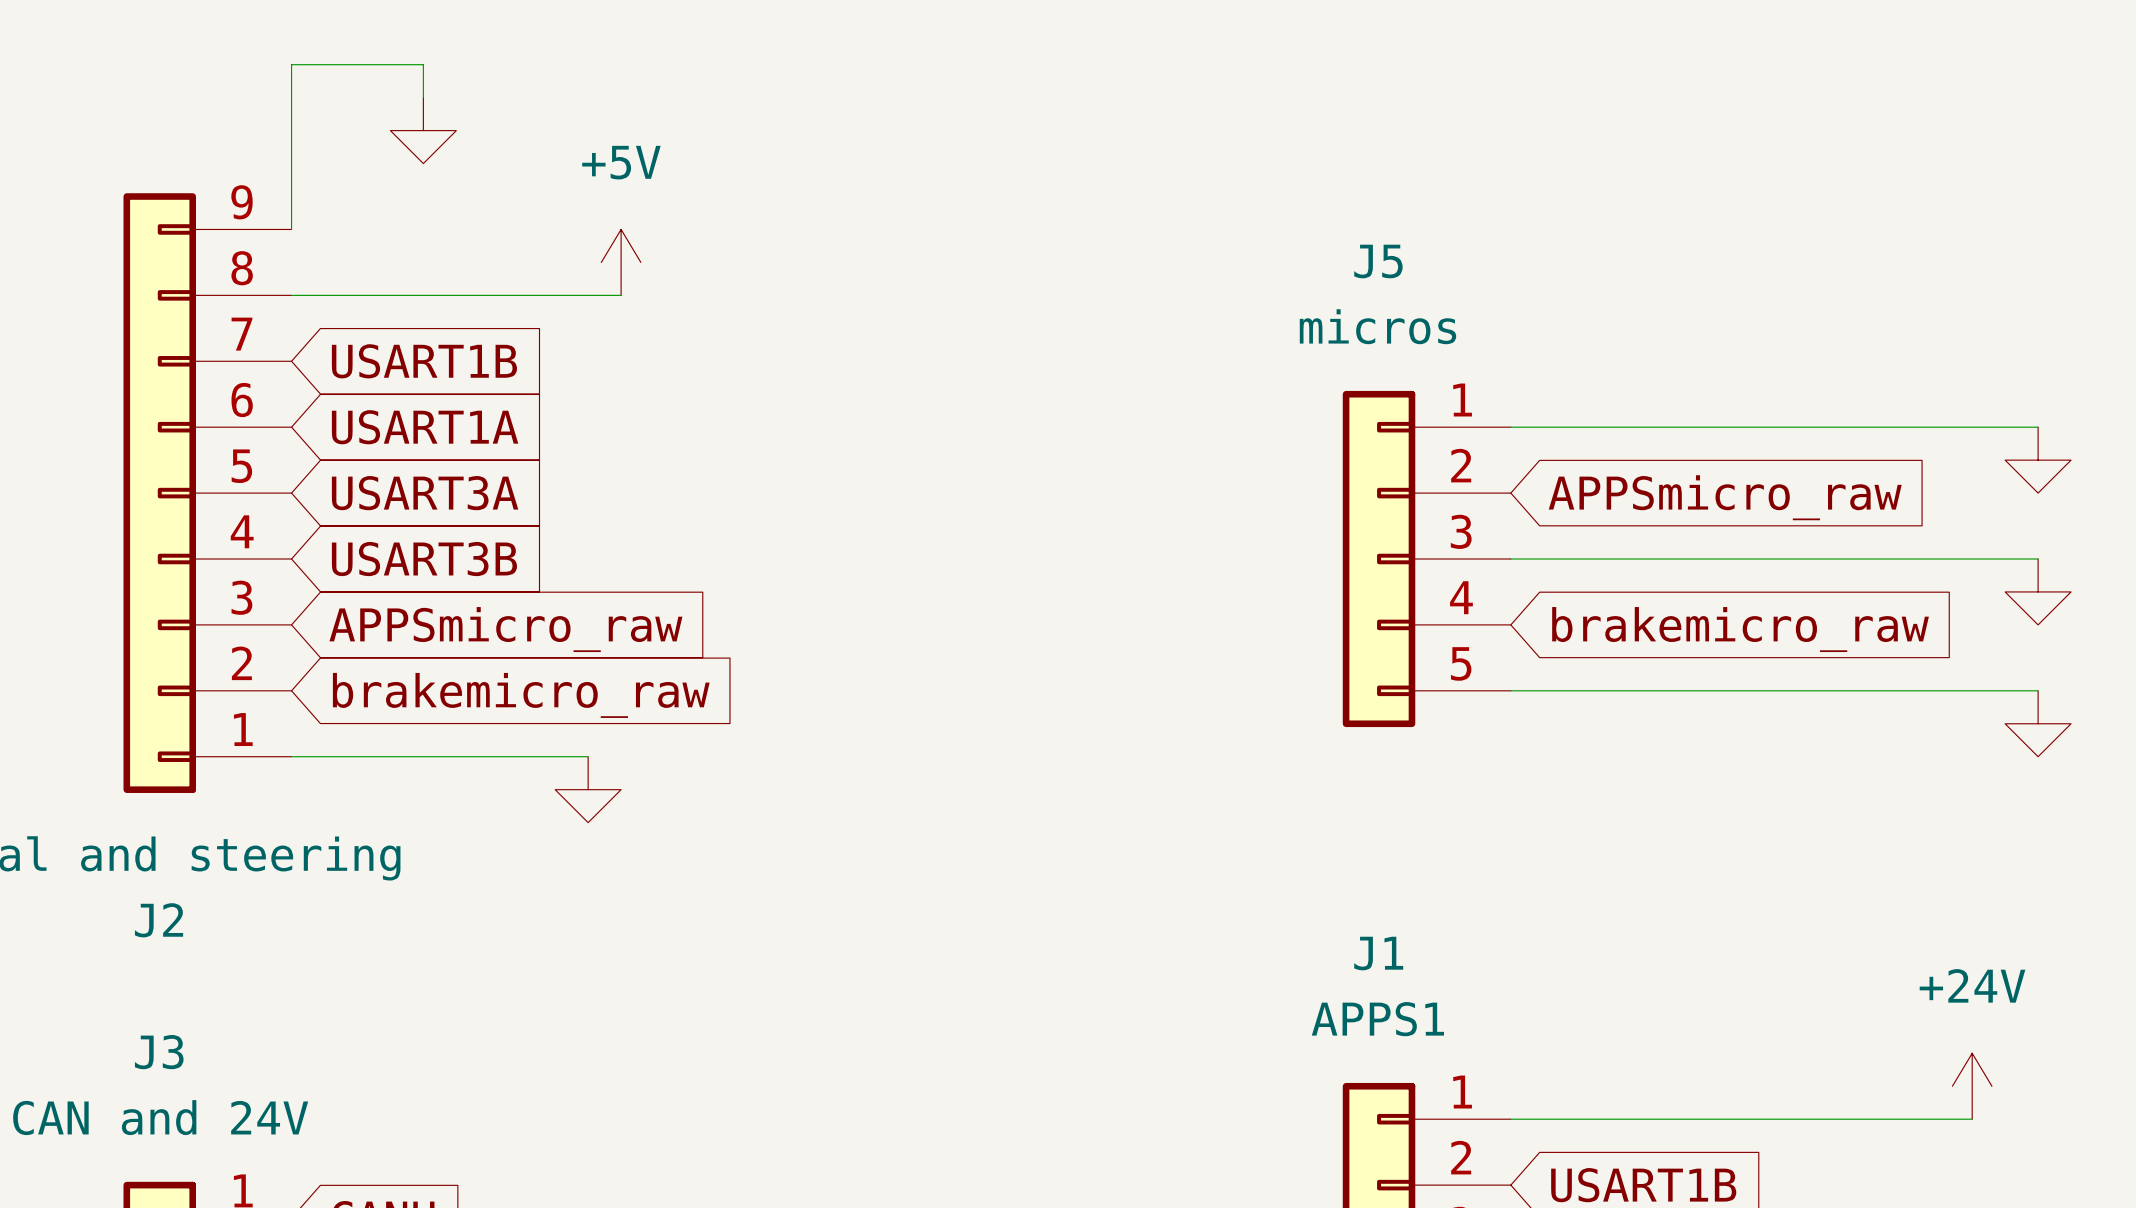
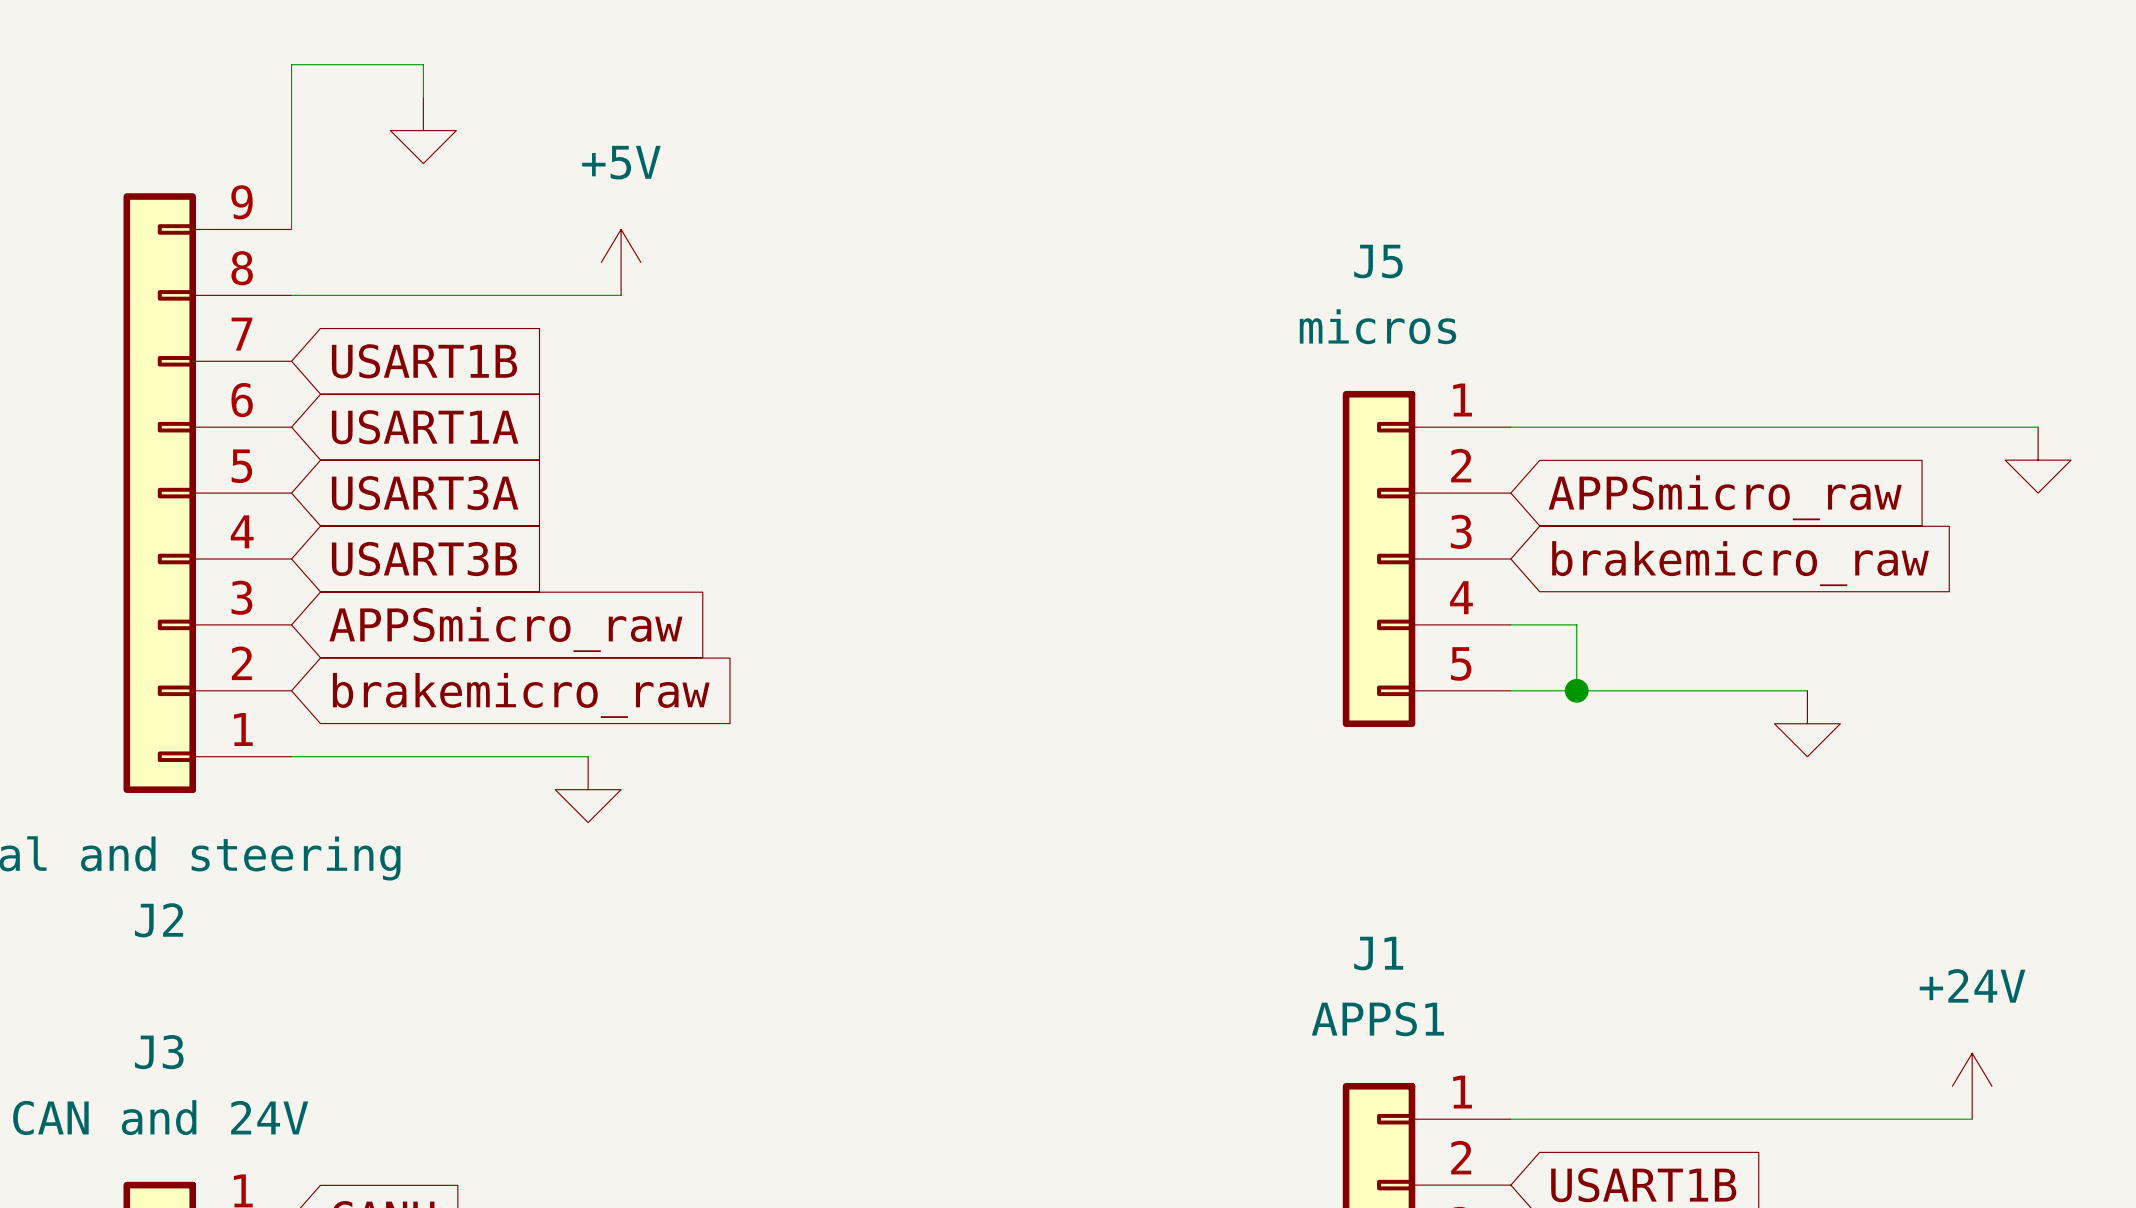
wire: (1510, 559) (2038, 559) -> none
power symbol: (2038, 591) -> none
wire: none -> (1510, 624) (1576, 624) (1576, 690)
global label position: brakemicro_raw (1740, 629) -> brakemicro_raw (1740, 563)
junction: none -> (1576, 690)
wire: (1807, 690) (2038, 690) -> none
power symbol: none -> (1807, 723)
power symbol: (2038, 723) -> none

